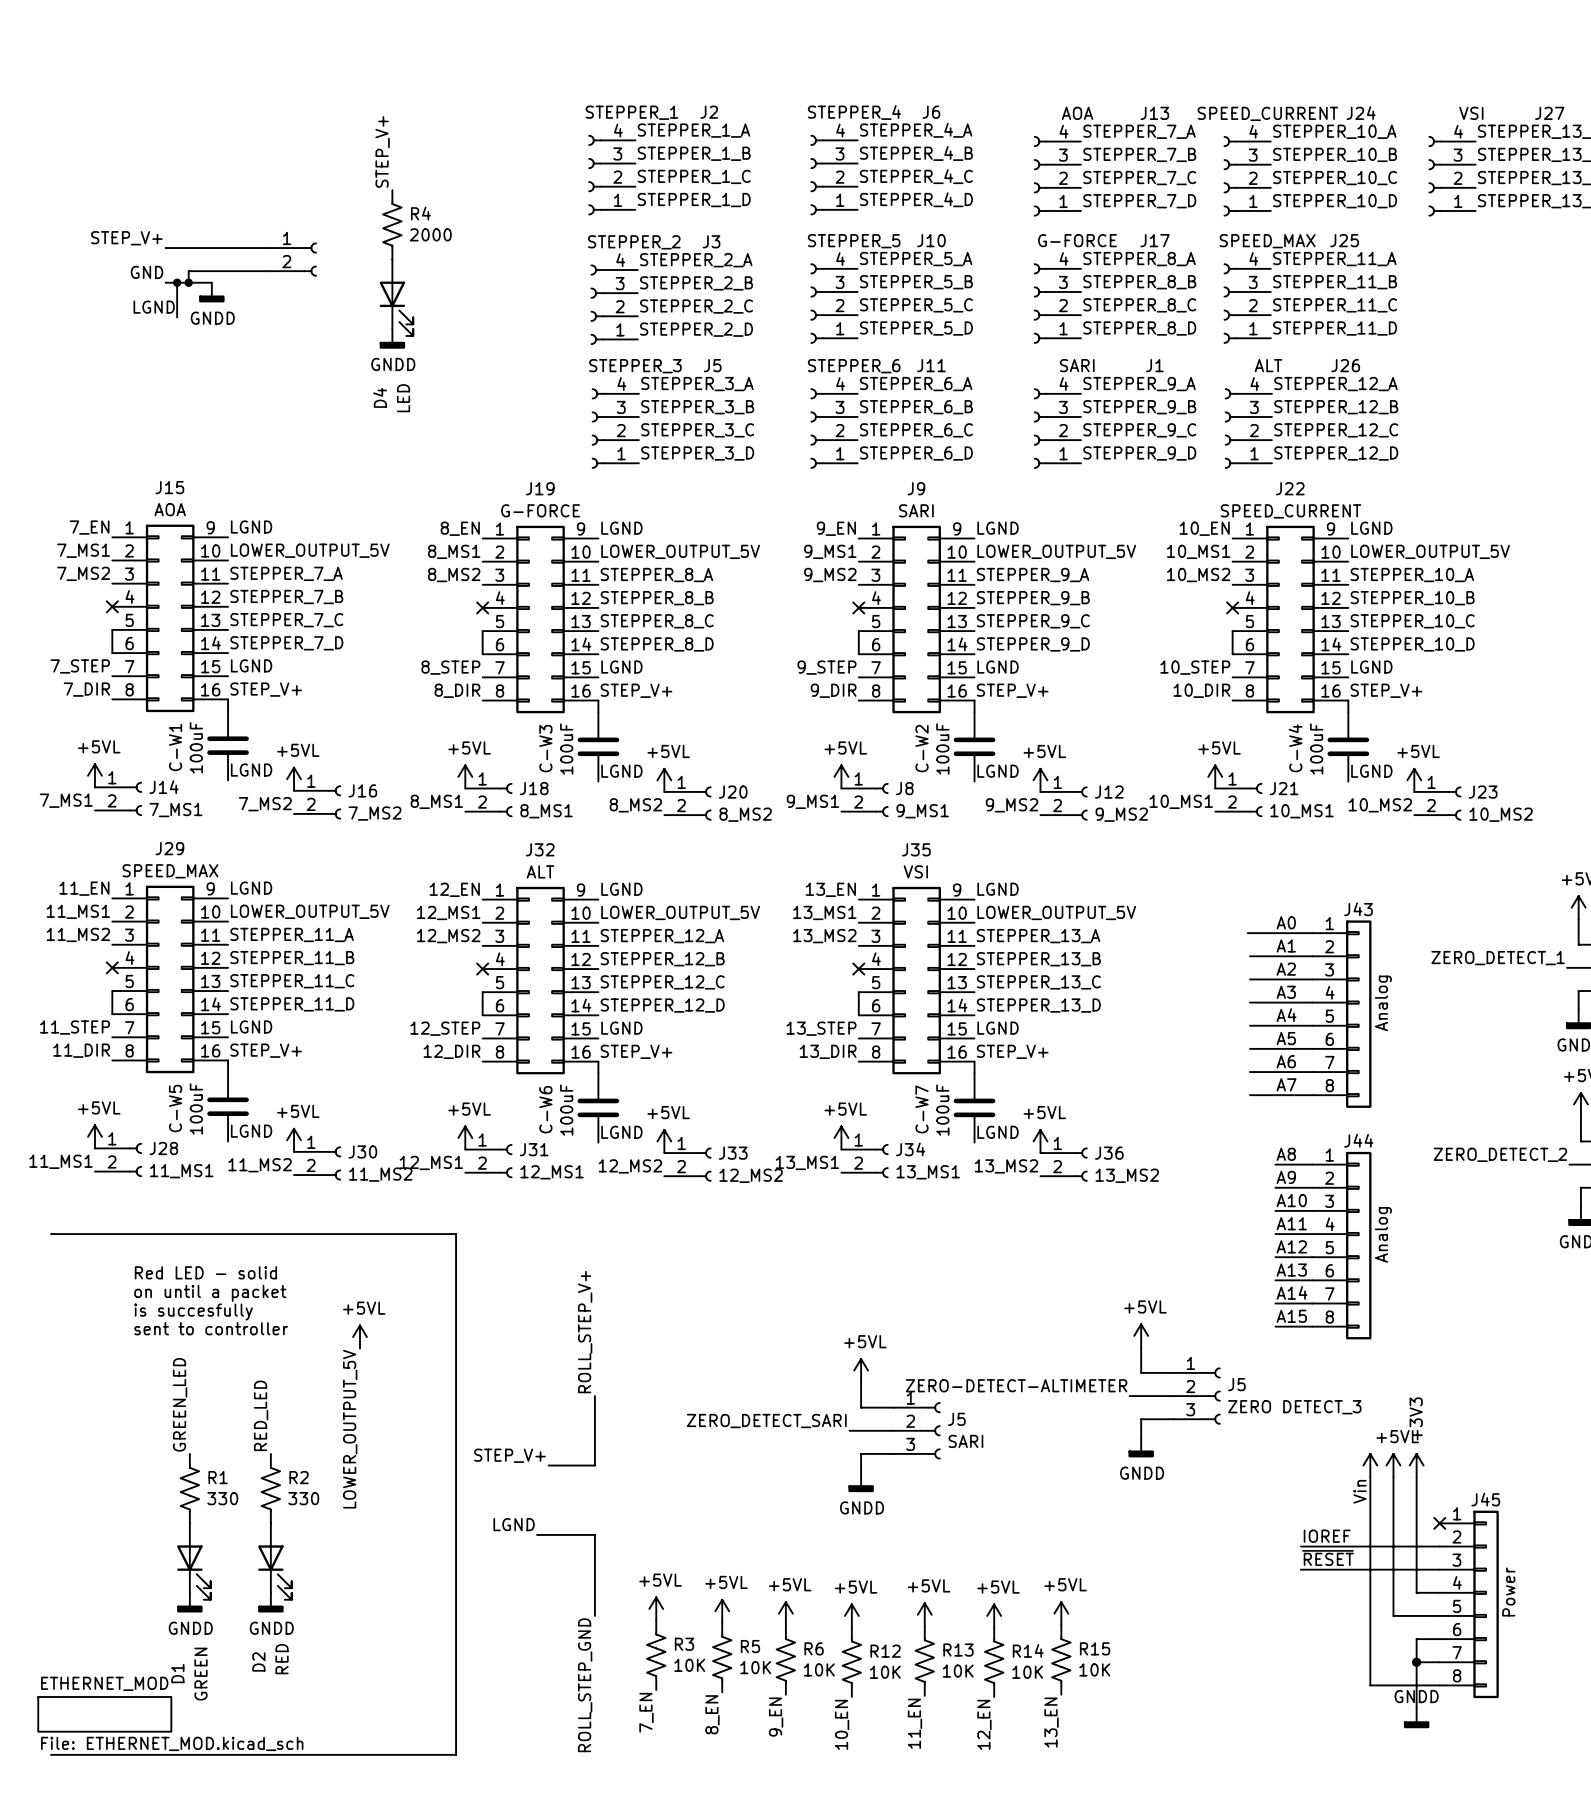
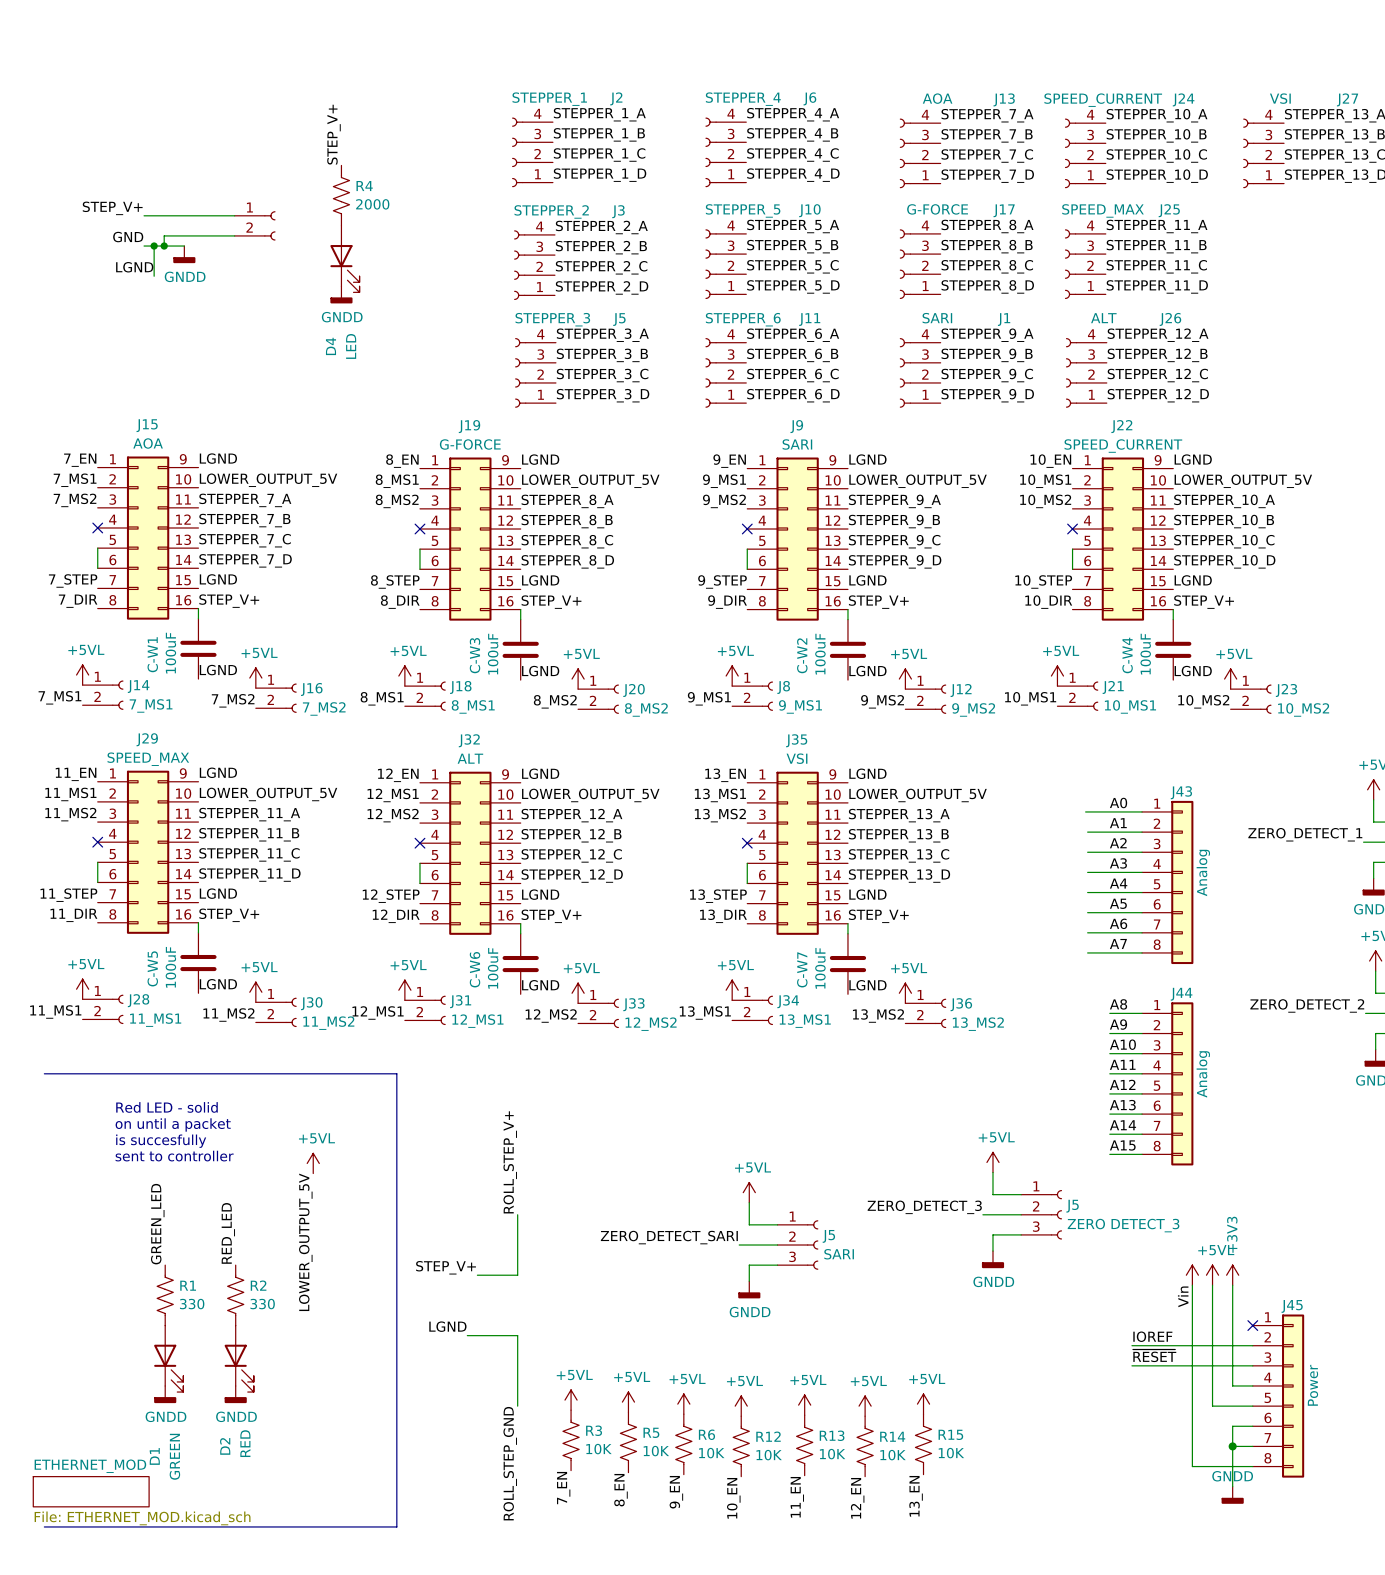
label: ZERO-DETECT-ALTIMETER (1016, 1385) -> ZERO_DETECT_3 (924, 1207)

